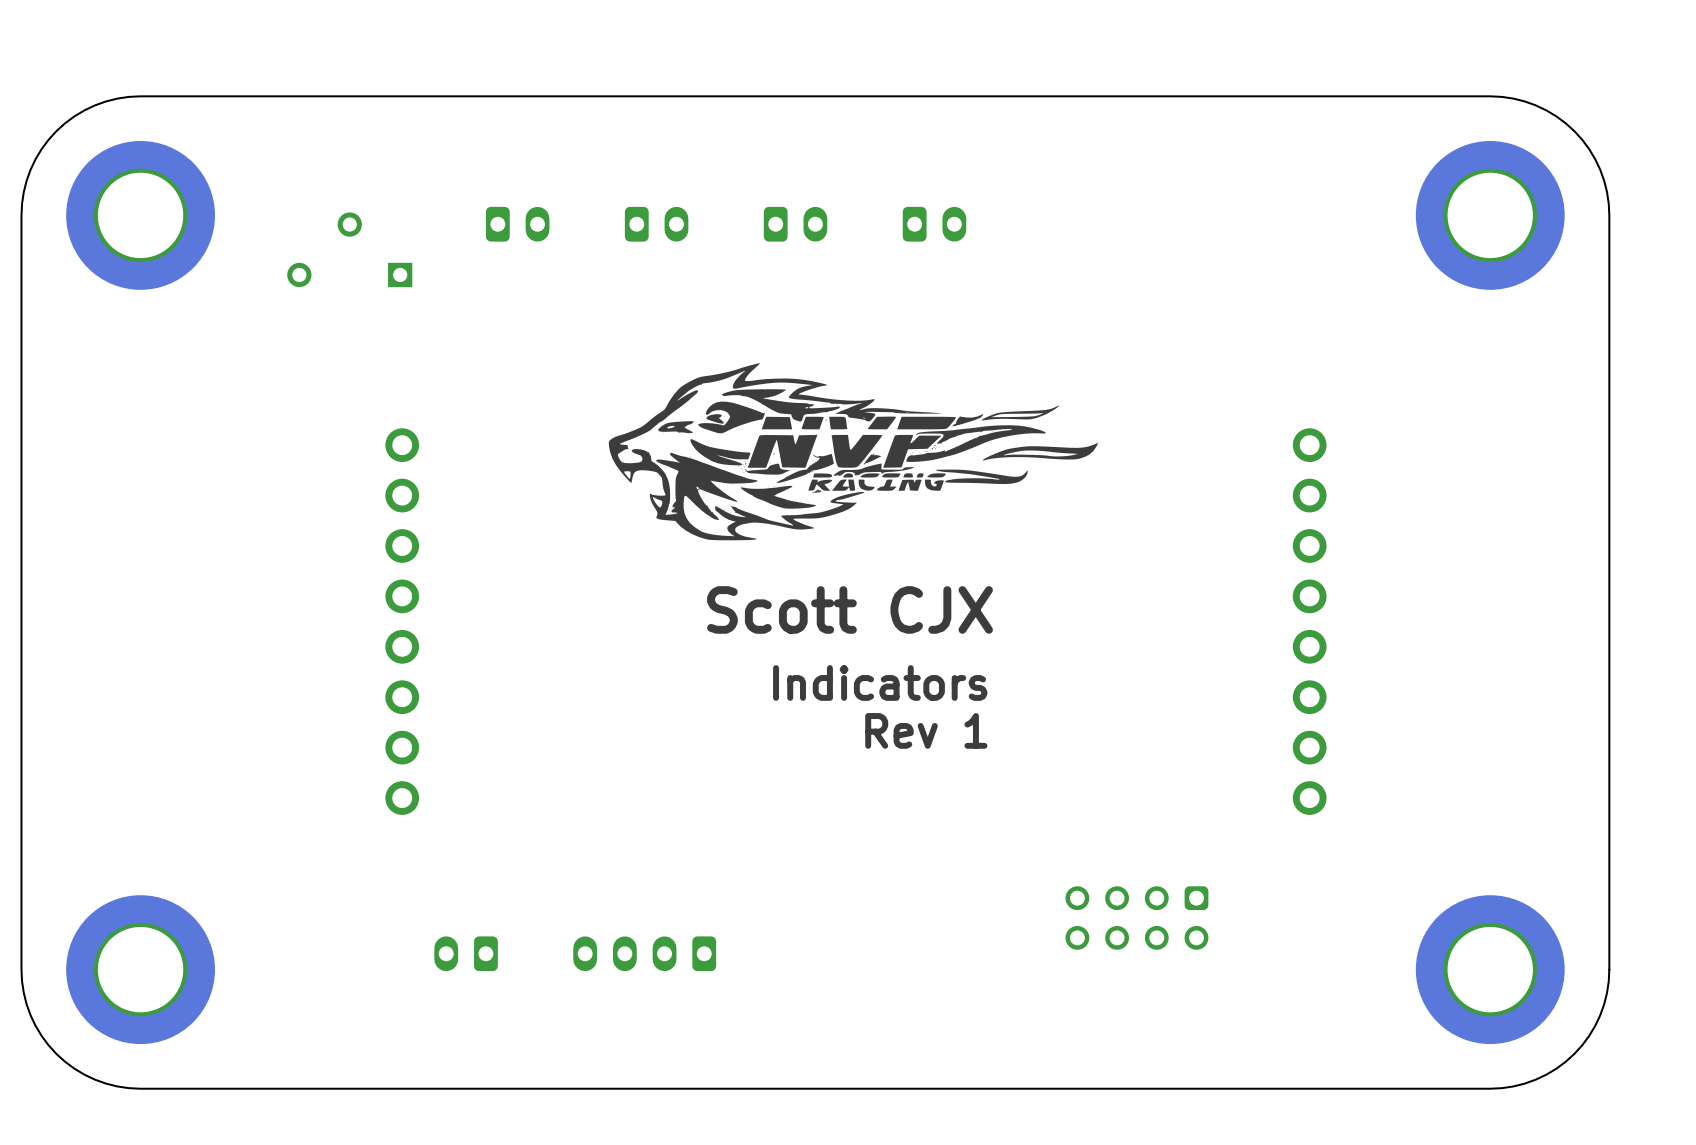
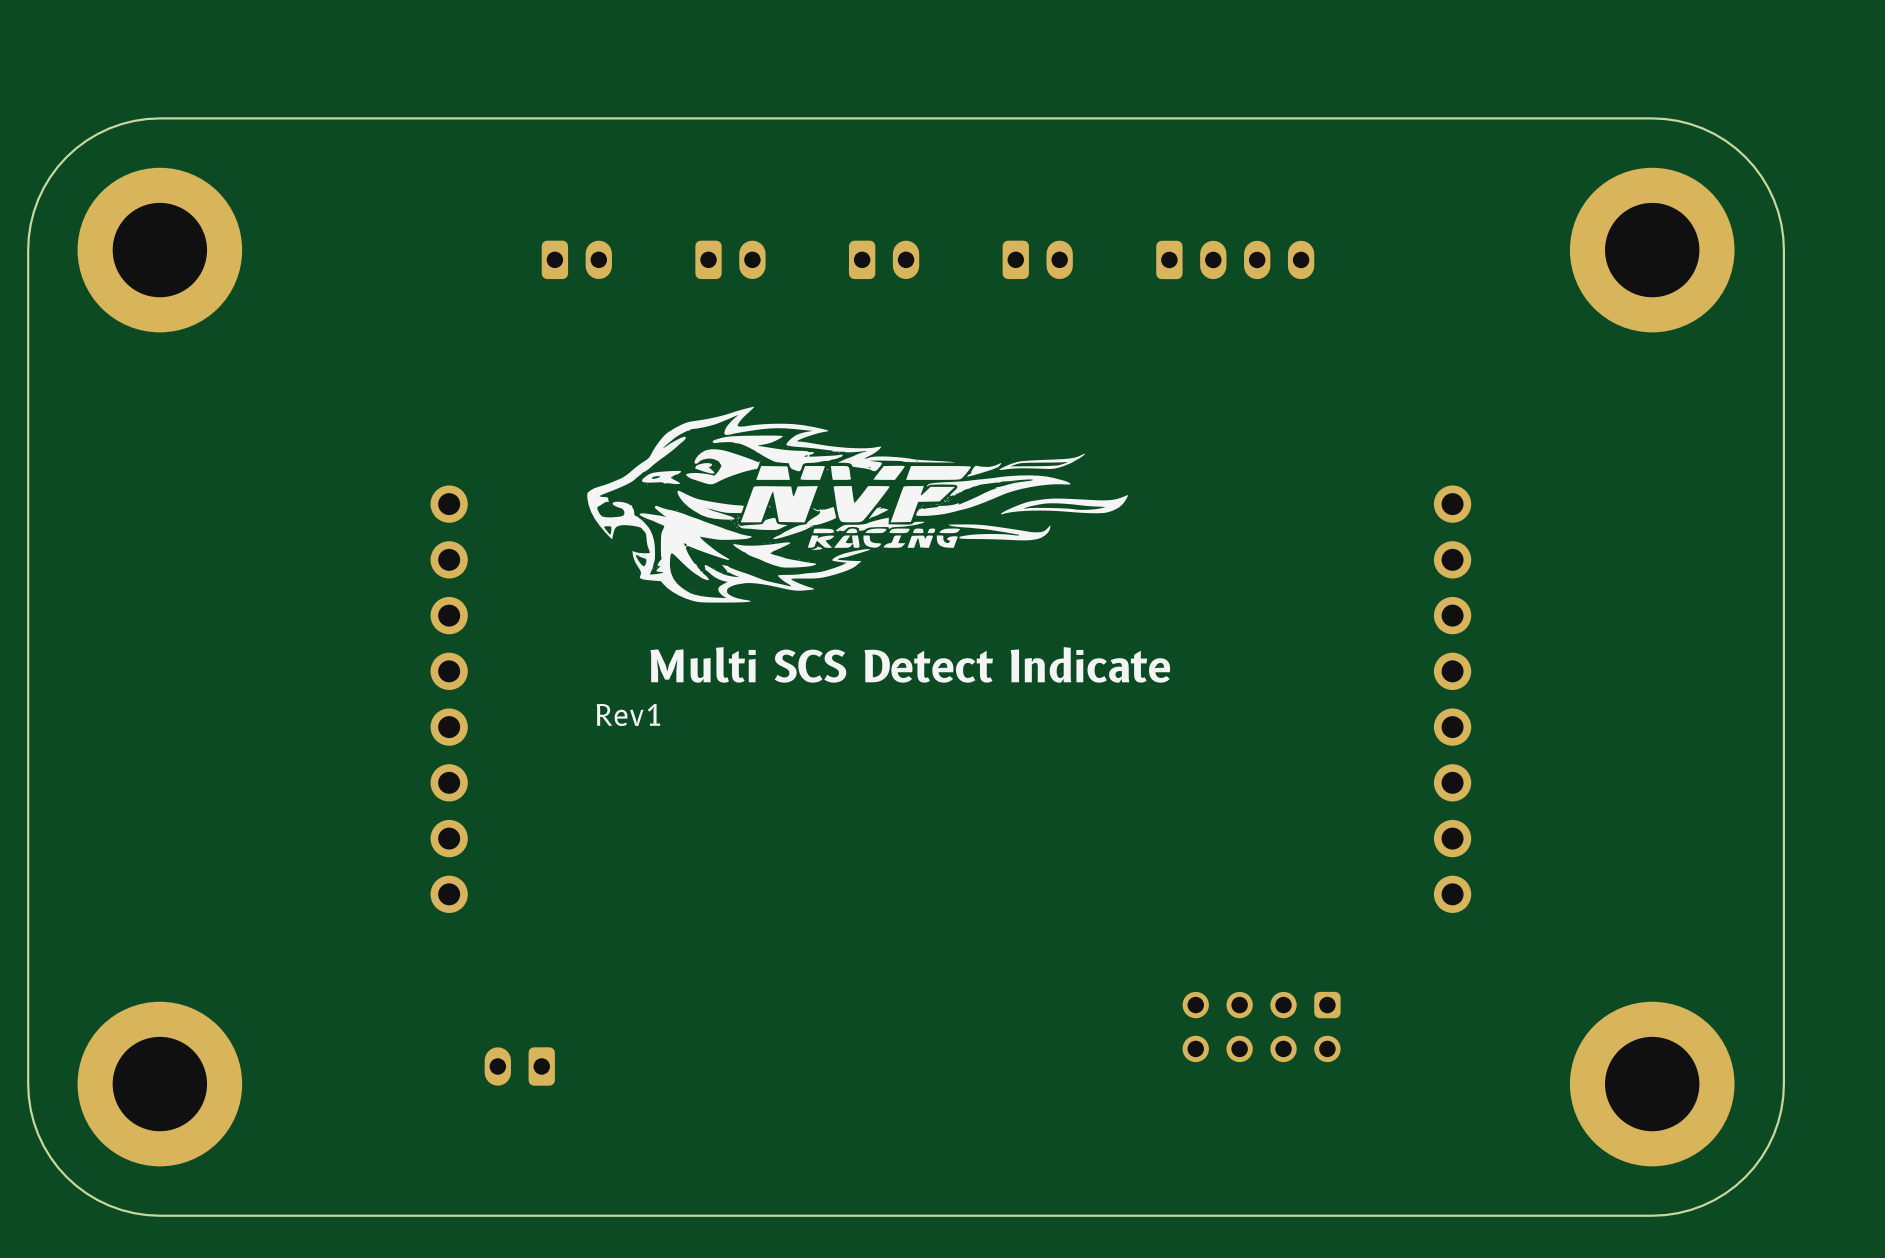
part: none -> (1235, 259)
part: (349, 249) -> none
drawing position: (853, 451) -> (857, 504)
text: none -> Multi SCS Detect Indicate (910, 664)
text: Scott CJX (850, 609) -> none
text: none -> Rev1 (628, 715)
text: Indicators (880, 682) -> none
text: Rev 1 (926, 730) -> none
part: (644, 953) -> none

